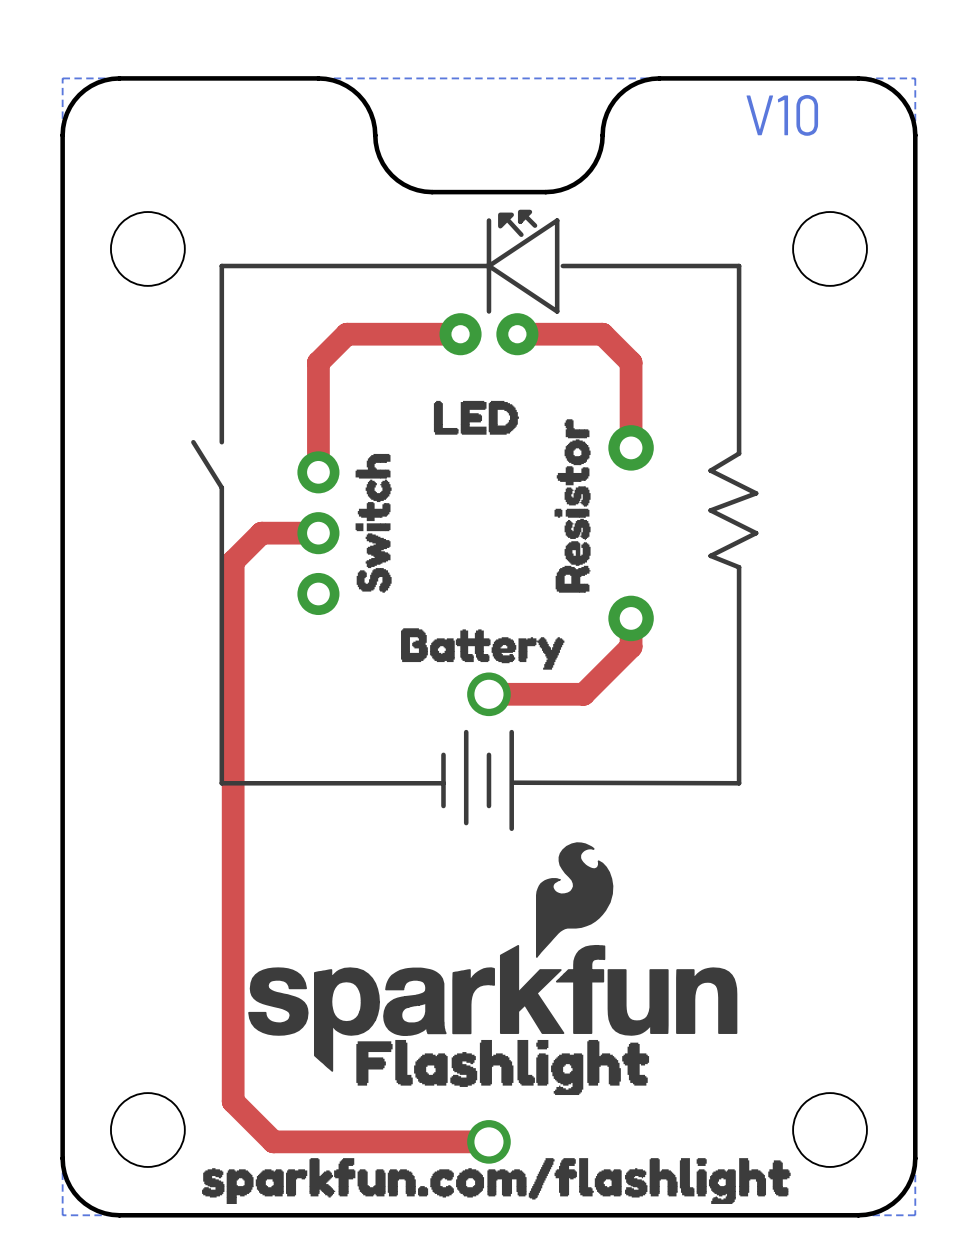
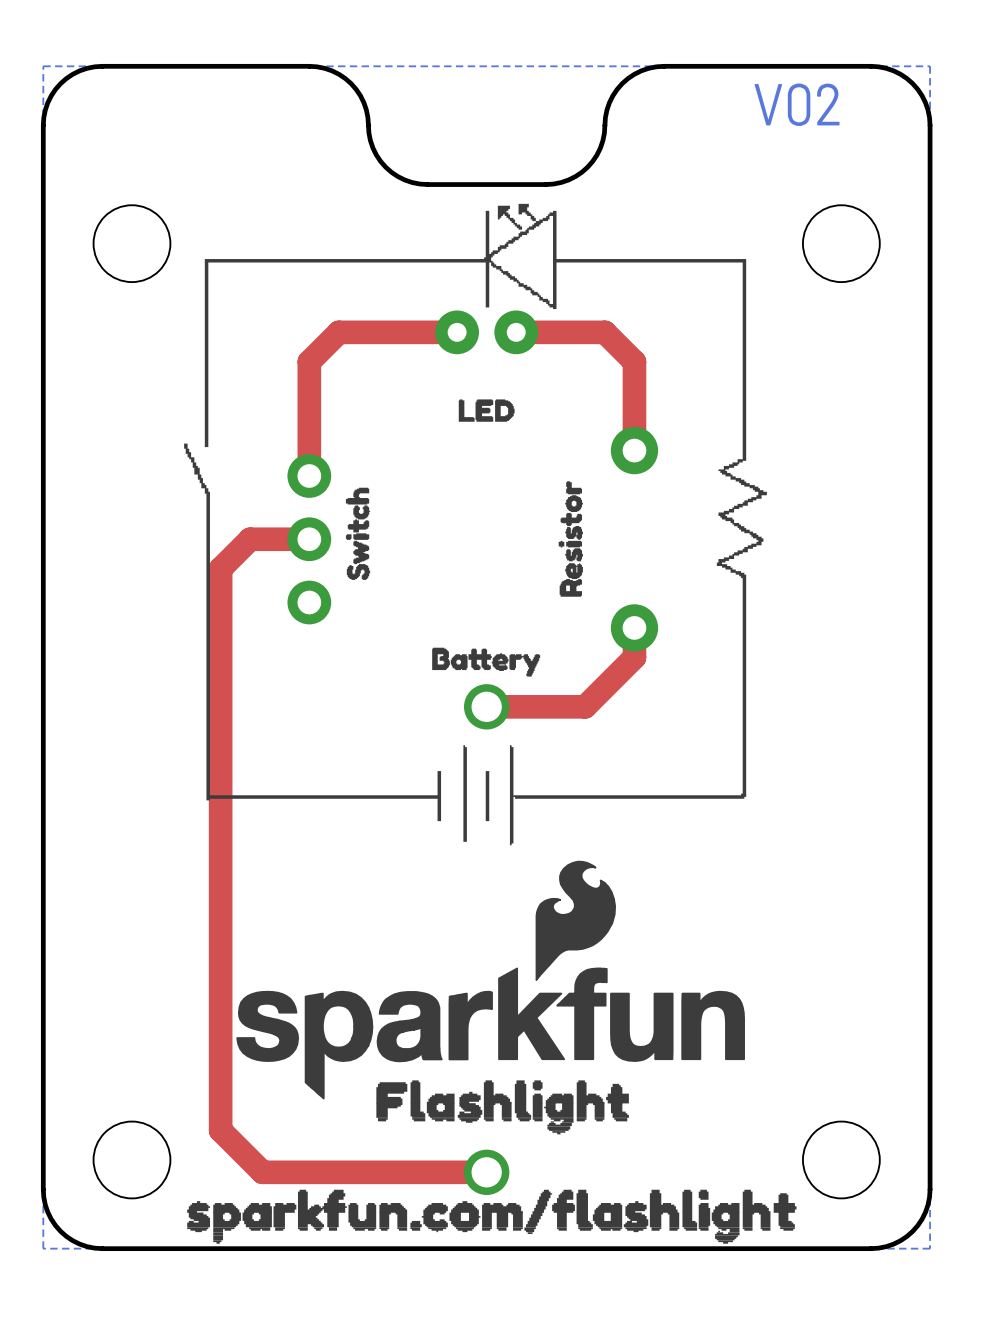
text: V10 (782, 115) -> V02 (797, 104)
drawing: [498, 209, 533, 229] -> none
drawing: none -> [184, 203, 767, 846]
line: (527, 217) (535, 225) -> none
line: (488, 220) (488, 311) -> none
line: (508, 221) (521, 234) -> none
line: (488, 266) (221, 266) (221, 442) -> none
line: (488, 266) (557, 311) (557, 220) (488, 266) -> none
line: (562, 266) (739, 266) (739, 453) (710, 470) (756, 493) (710, 510) (756, 533) (710, 555) (739, 567) (739, 783) (513, 782) -> none
drawing shape: [433, 400, 519, 435] -> [458, 399, 515, 422]
drawing: [554, 419, 591, 593] -> none
line: (193, 442) (221, 487) (221, 783) (443, 783) -> none
drawing shape: [355, 453, 392, 593] -> [345, 487, 371, 580]
drawing shape: [401, 628, 565, 670] -> [432, 647, 541, 677]
line: (466, 732) (466, 823) -> none
line: (511, 732) (511, 828) -> none
line: (443, 754) (443, 806) -> none
line: (488, 754) (488, 806) -> none
drawing shape: [356, 1039, 650, 1096] -> [376, 1080, 629, 1135]
drawing shape: [202, 1158, 791, 1205] -> [187, 1189, 797, 1244]

